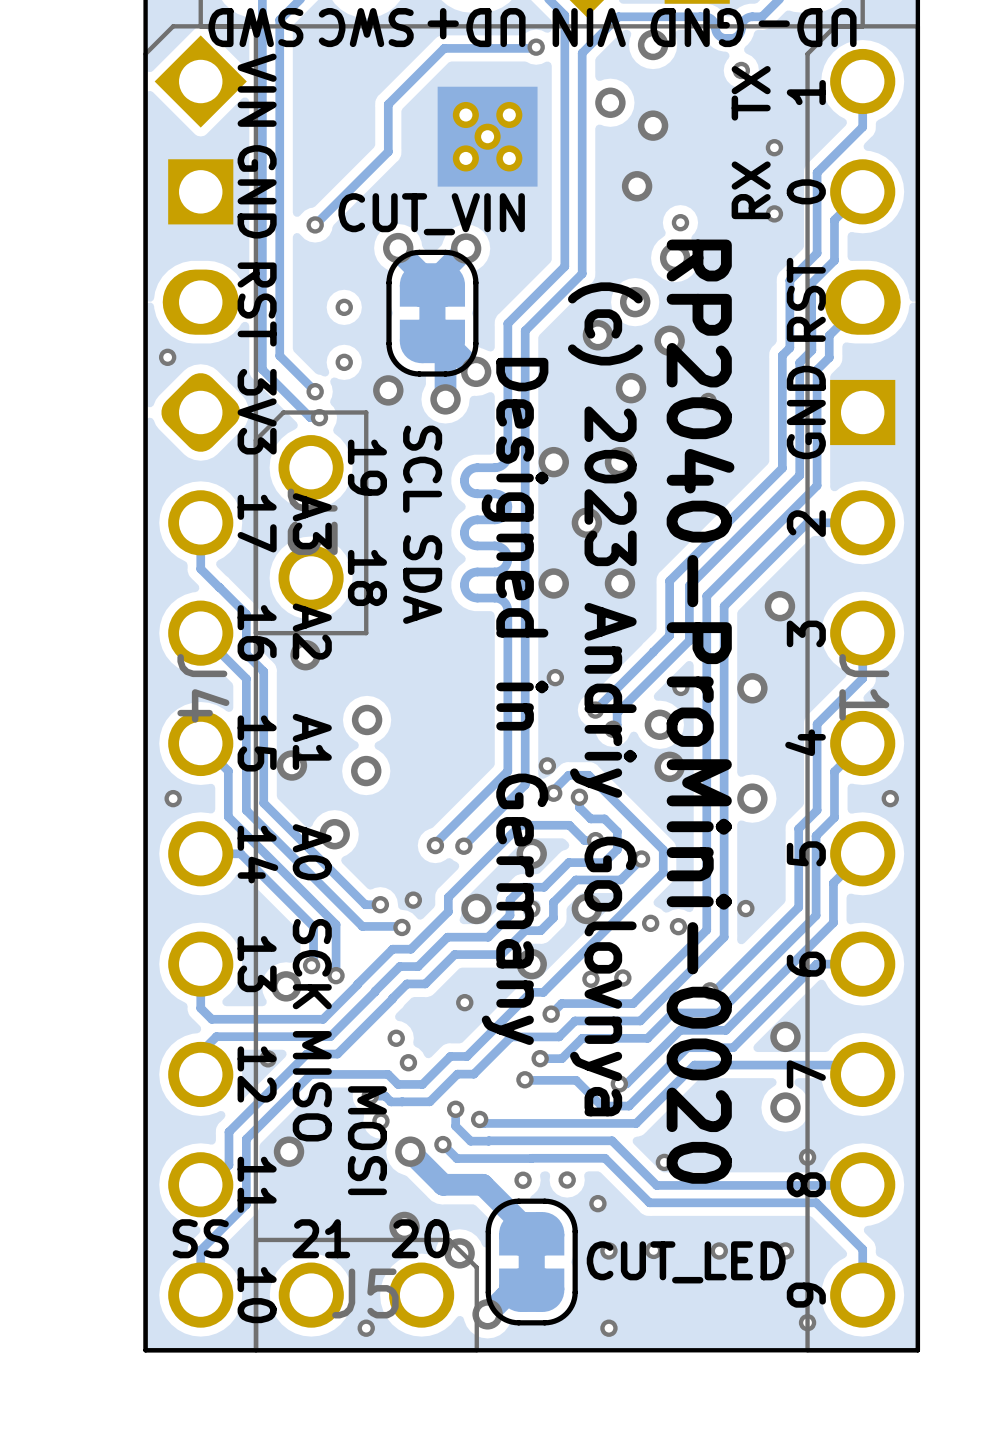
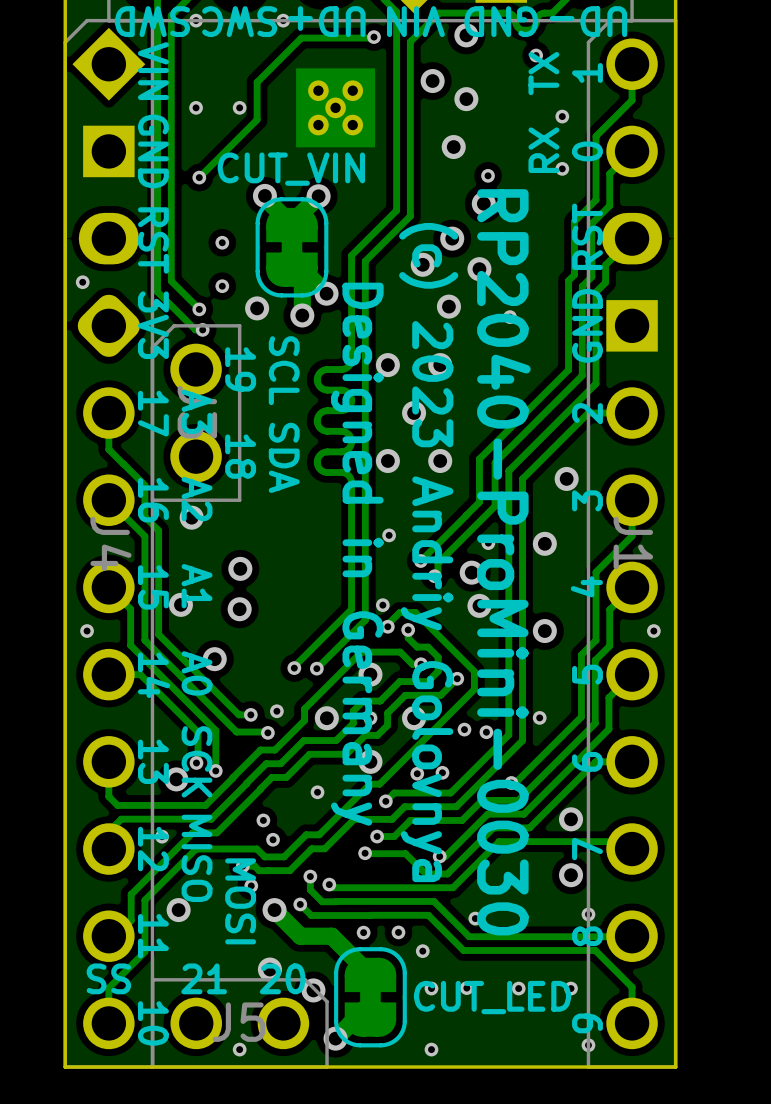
via: none -> (196, 20)
via: none -> (283, 20)
via: none -> (196, 107)
via: none -> (239, 107)
text: RP2040-ProMini-0020 (700, 711) -> RP2040-ProMini-0030 (503, 562)

